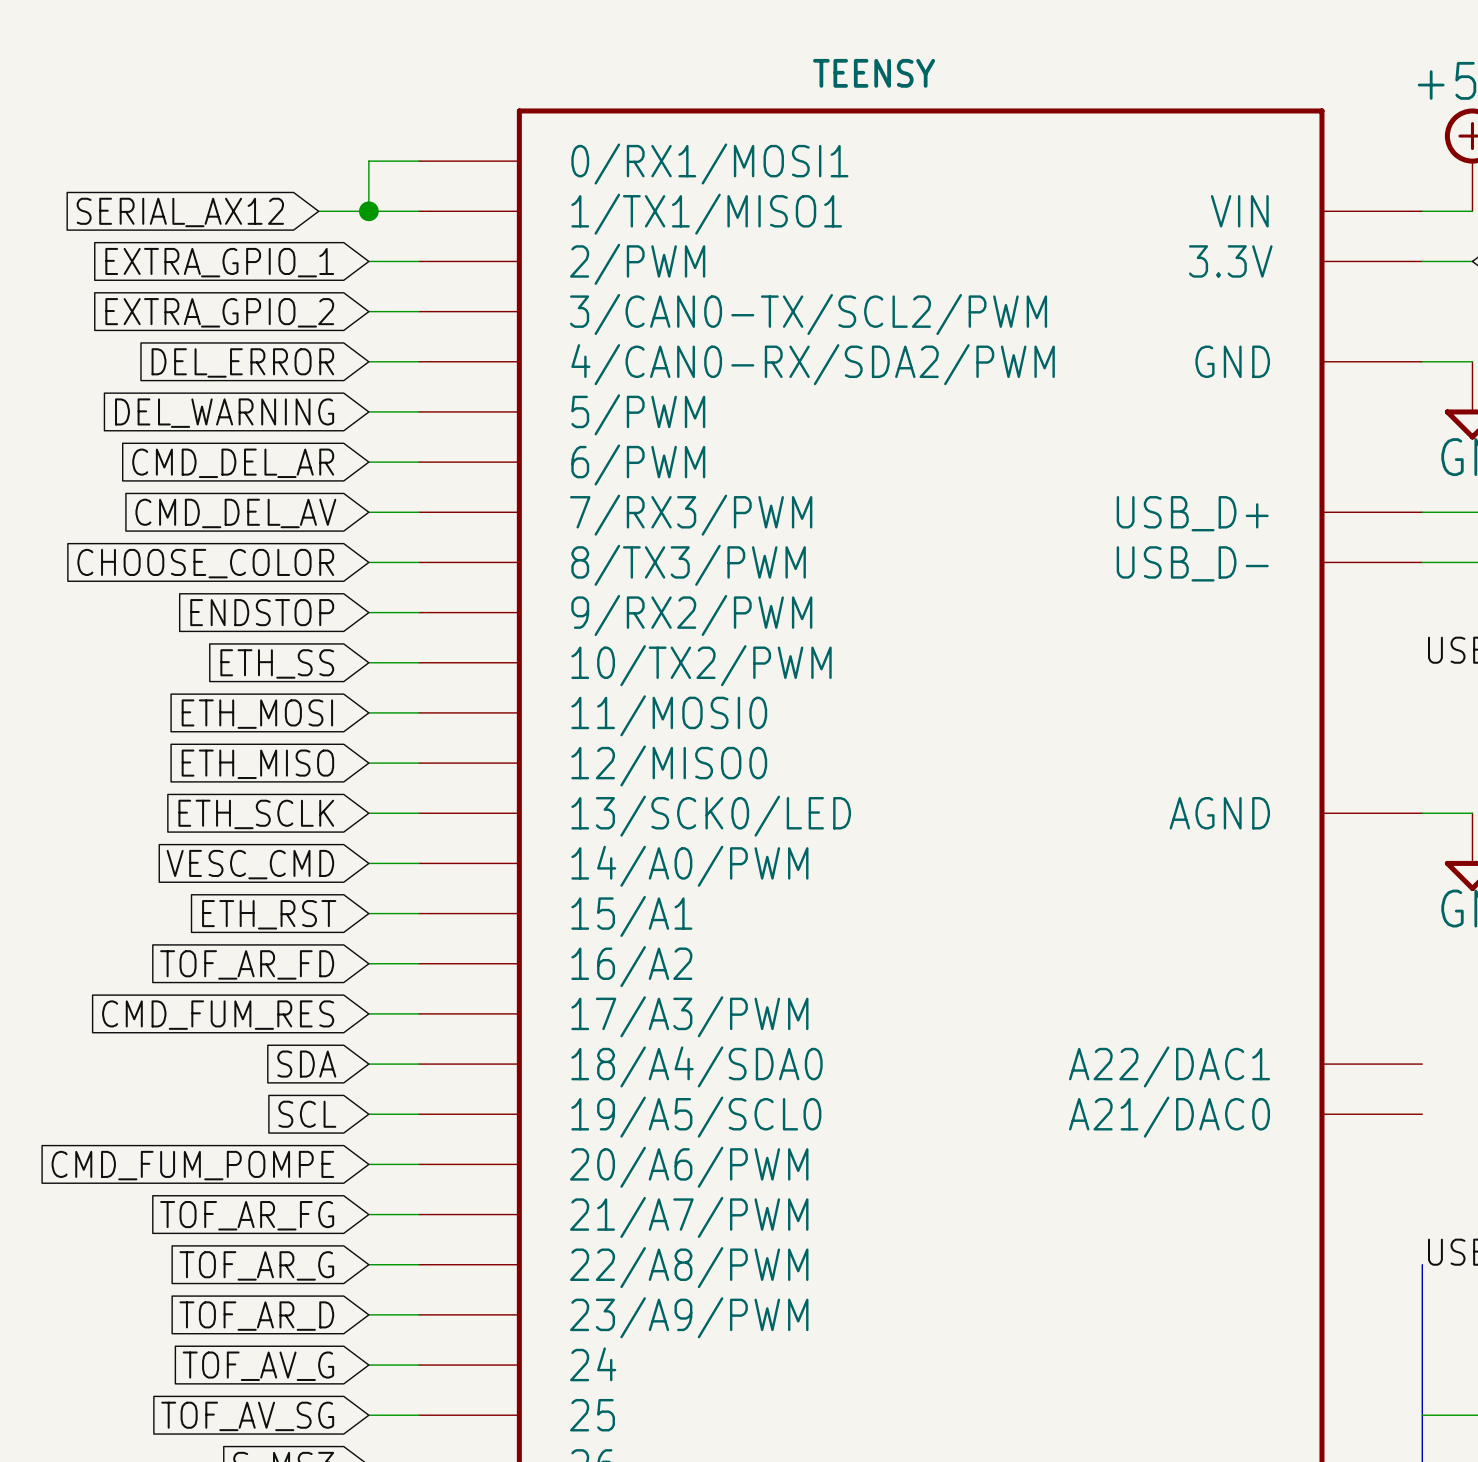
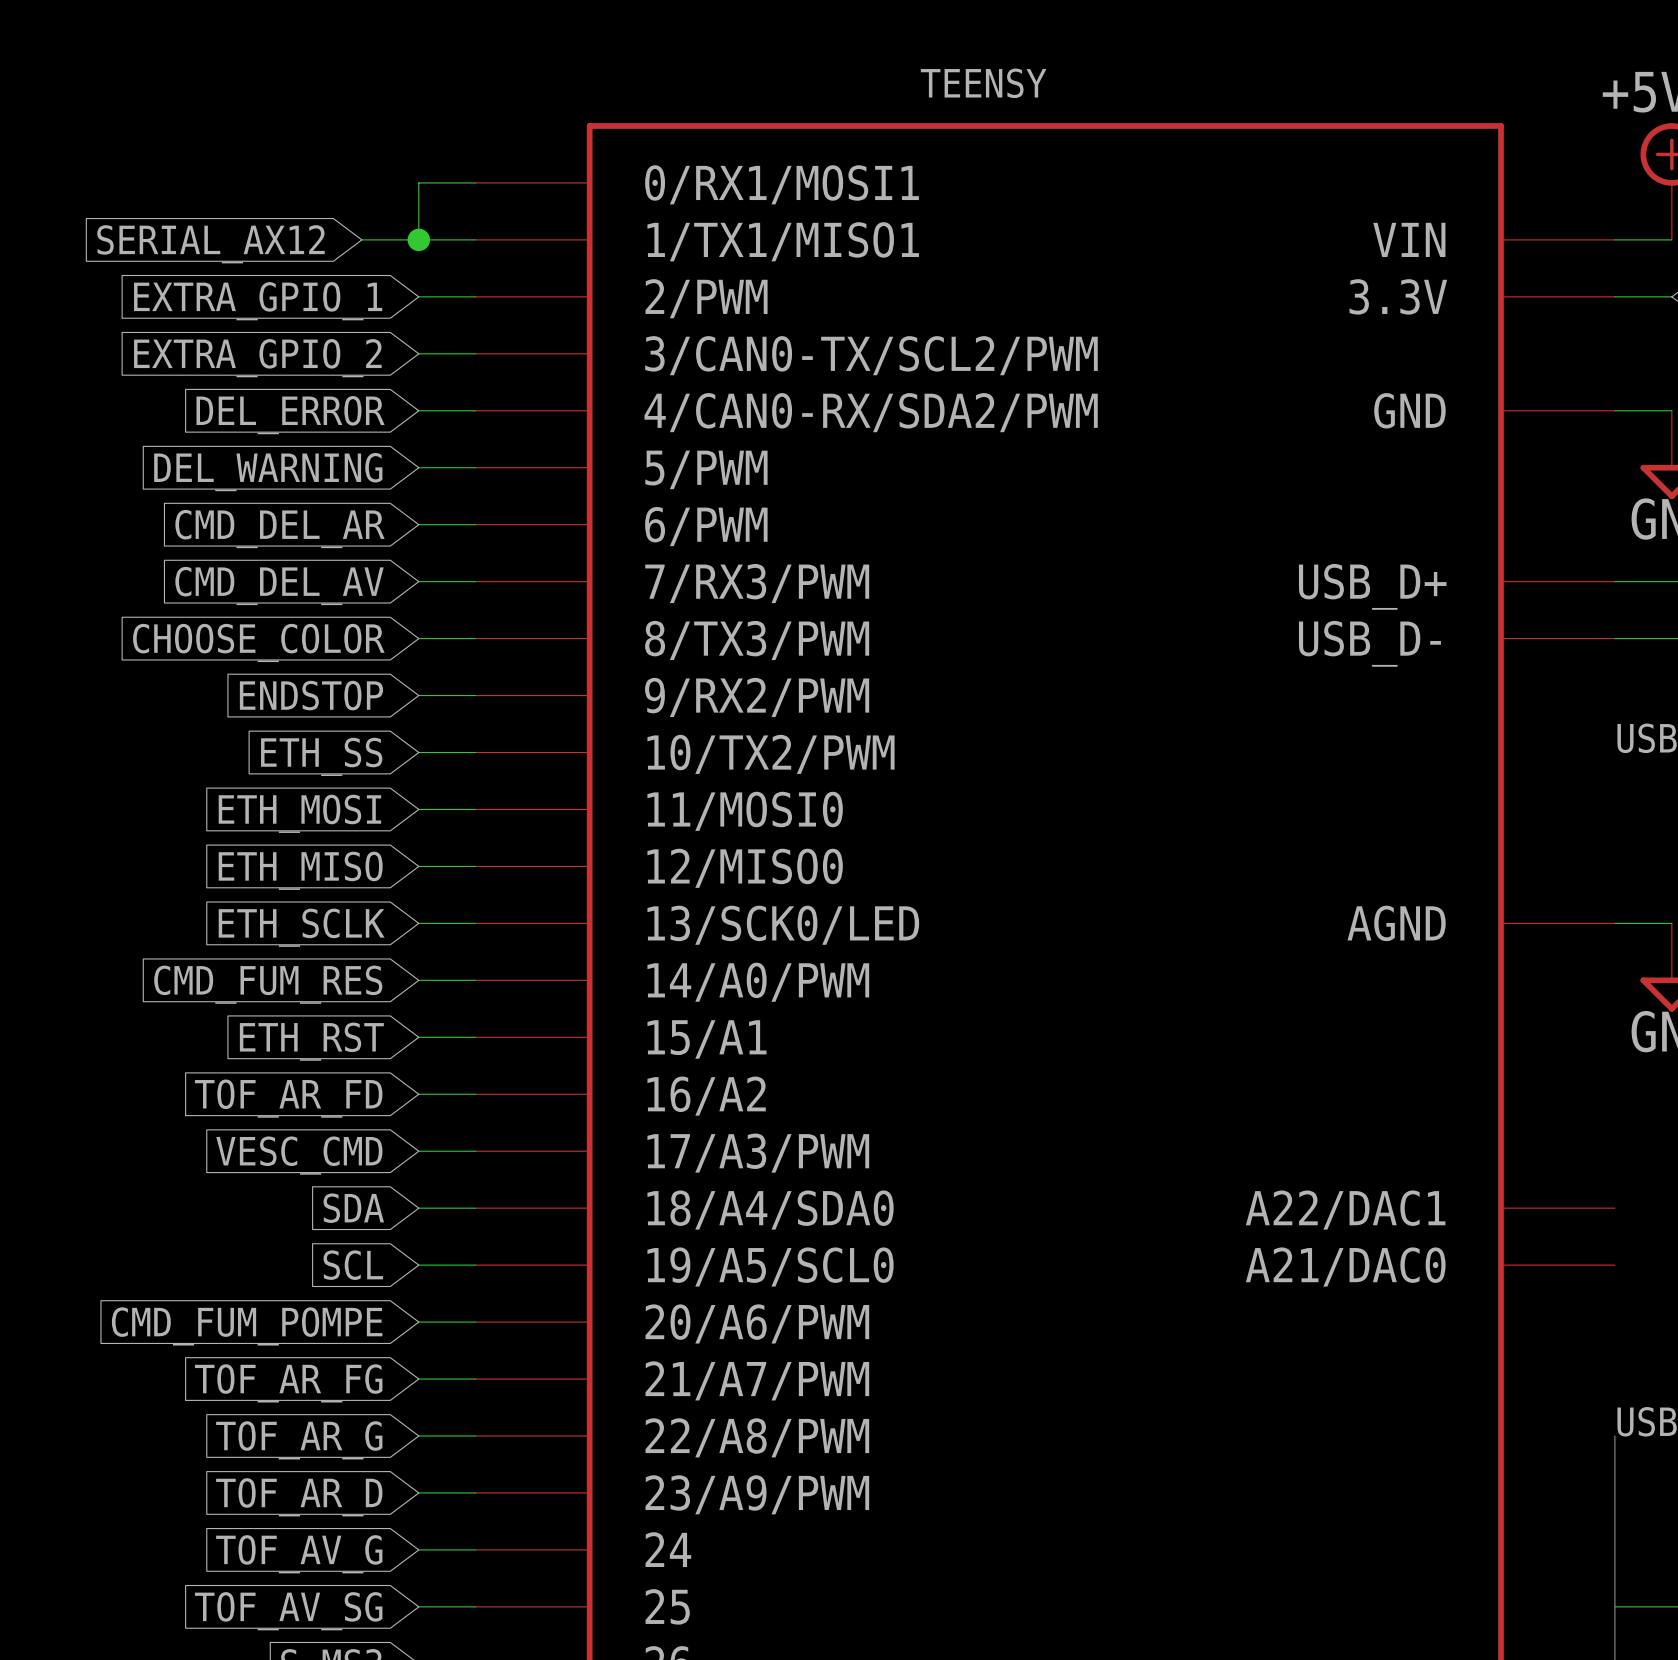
global label: VESC_CMD (250, 864) -> CMD_FUM_RES (268, 984)
global label: CMD_FUM_RES (218, 1015) -> VESC_CMD (299, 1155)

